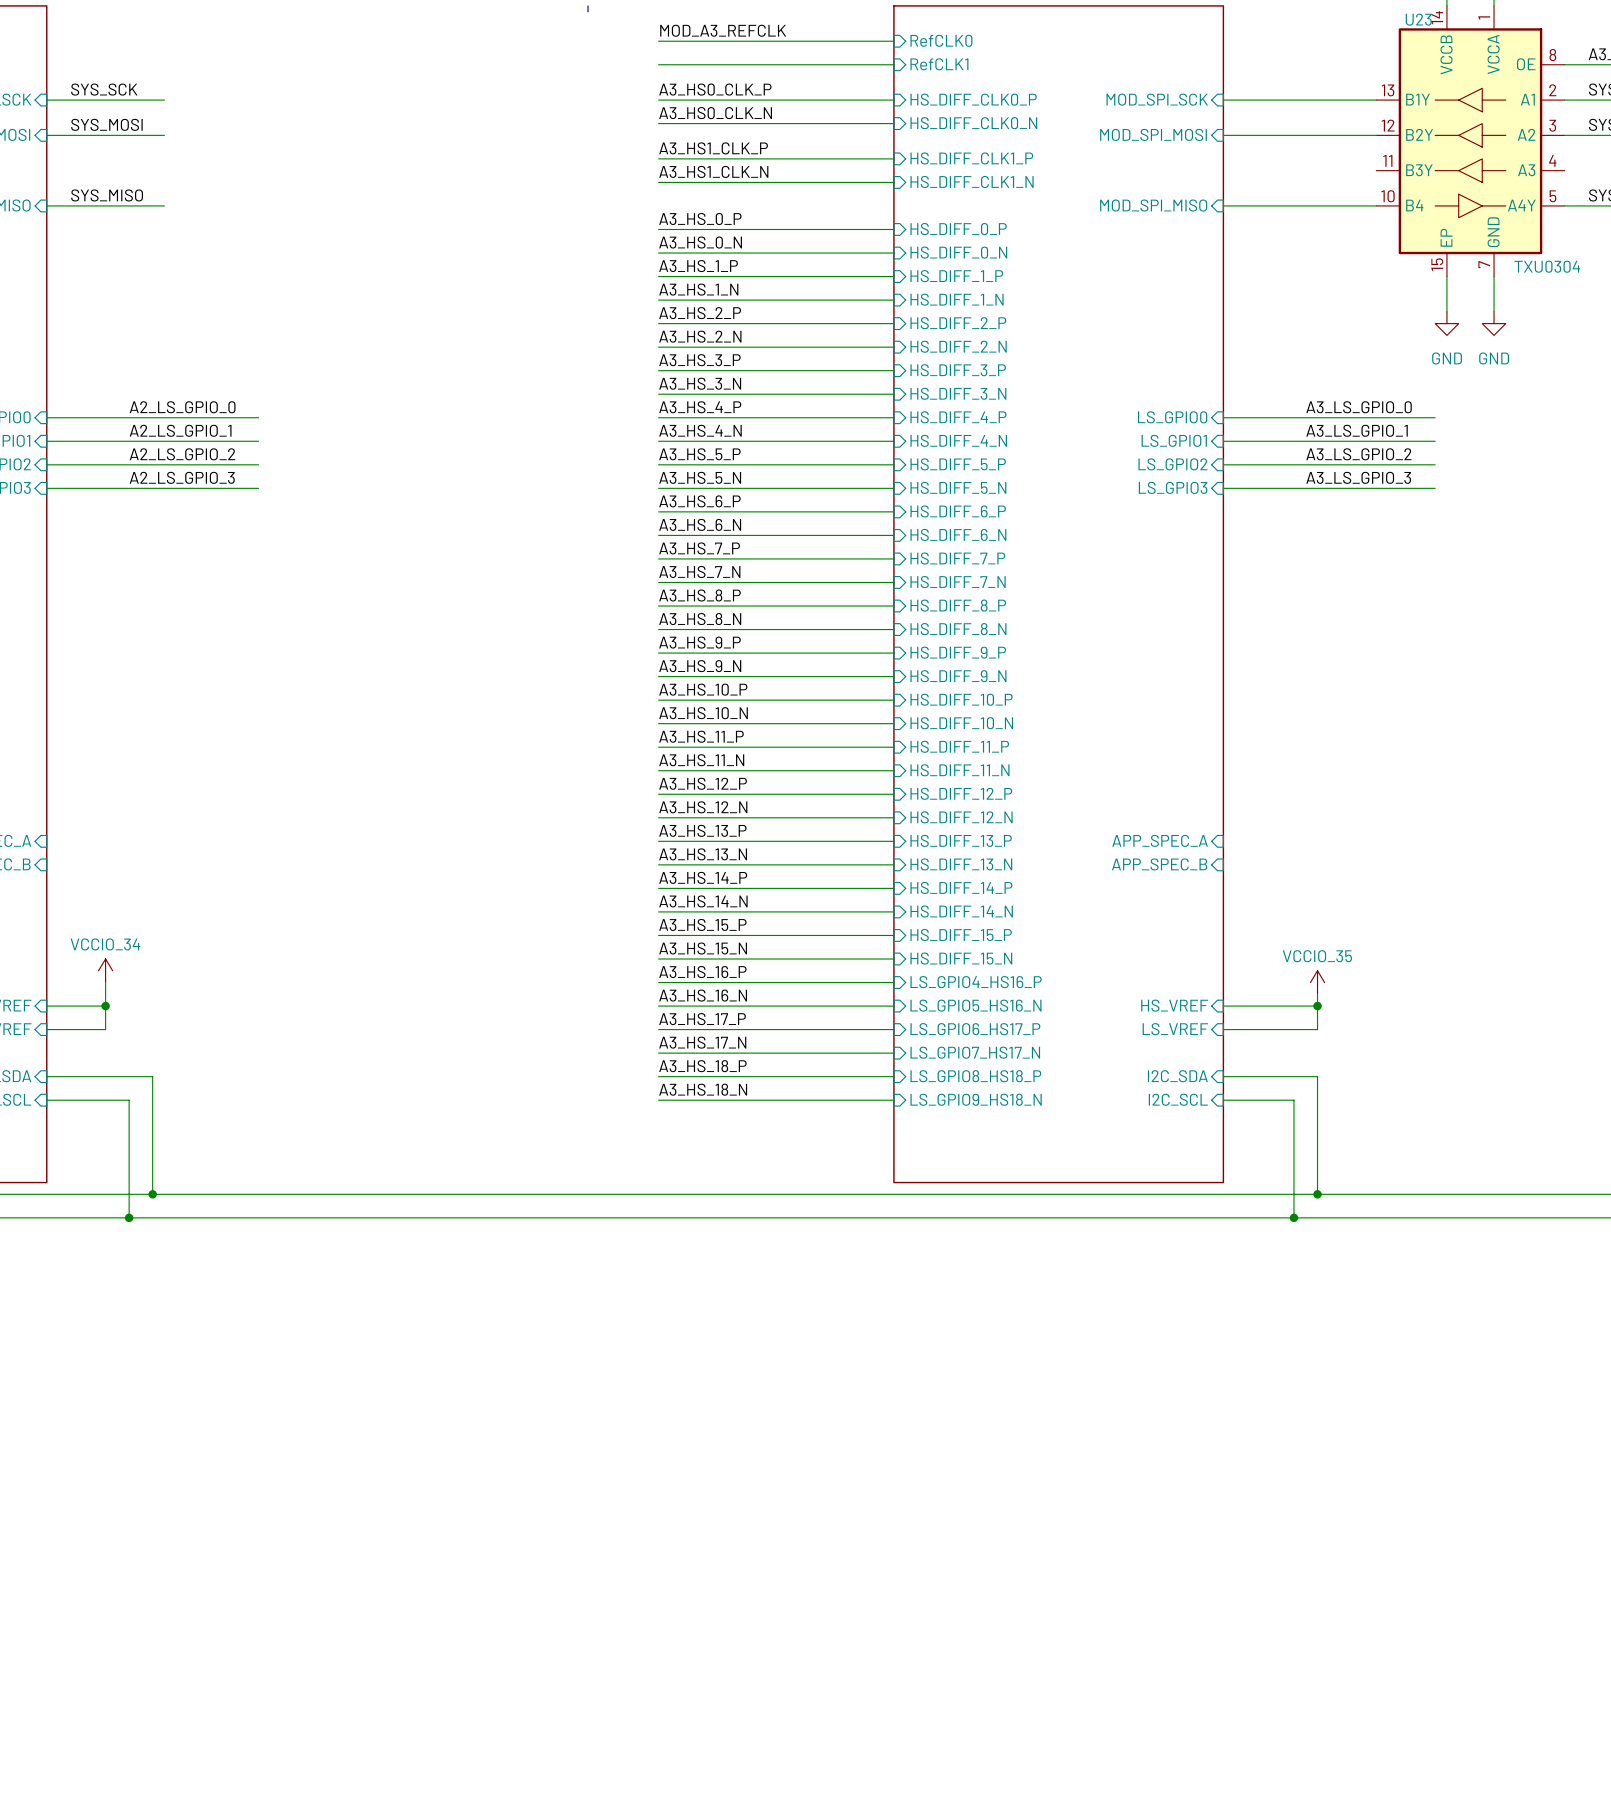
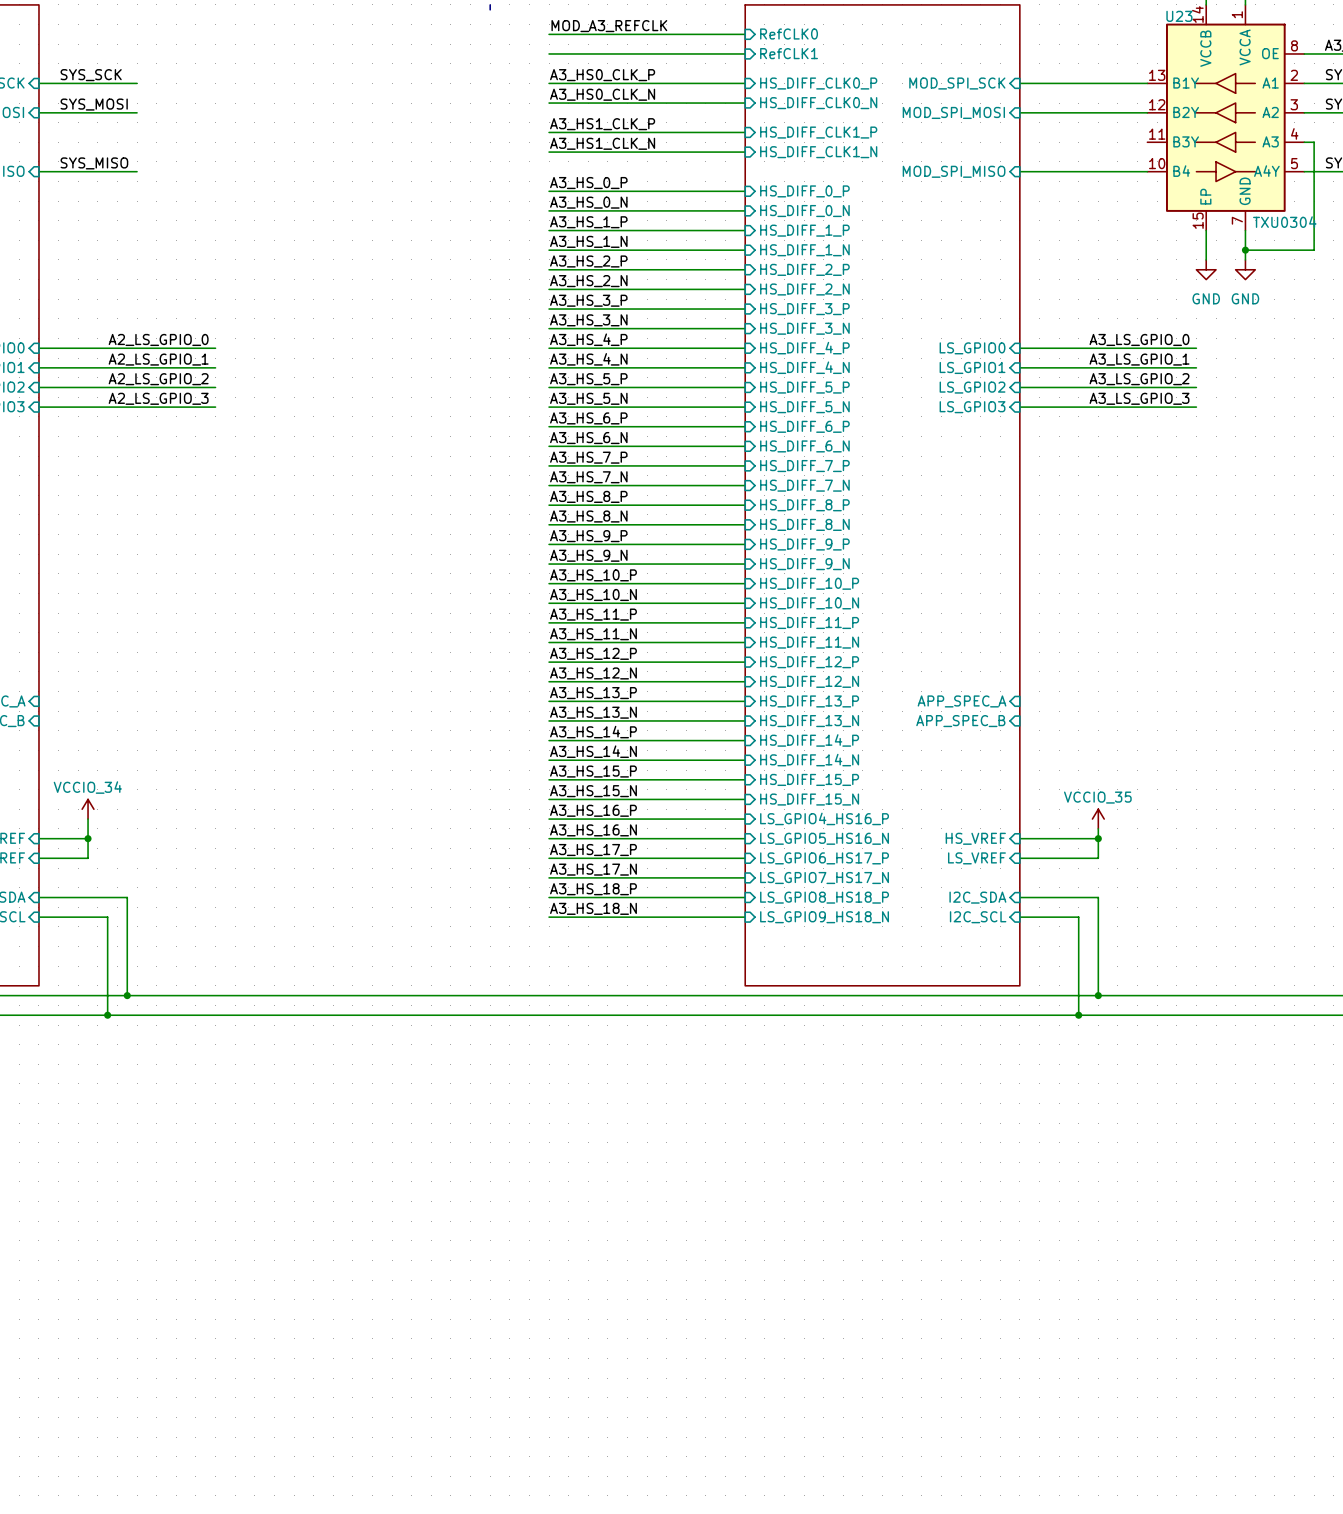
wire: none -> (1304, 142) (1314, 142) (1314, 250) (1245, 250)
junction: none -> (1245, 250)

